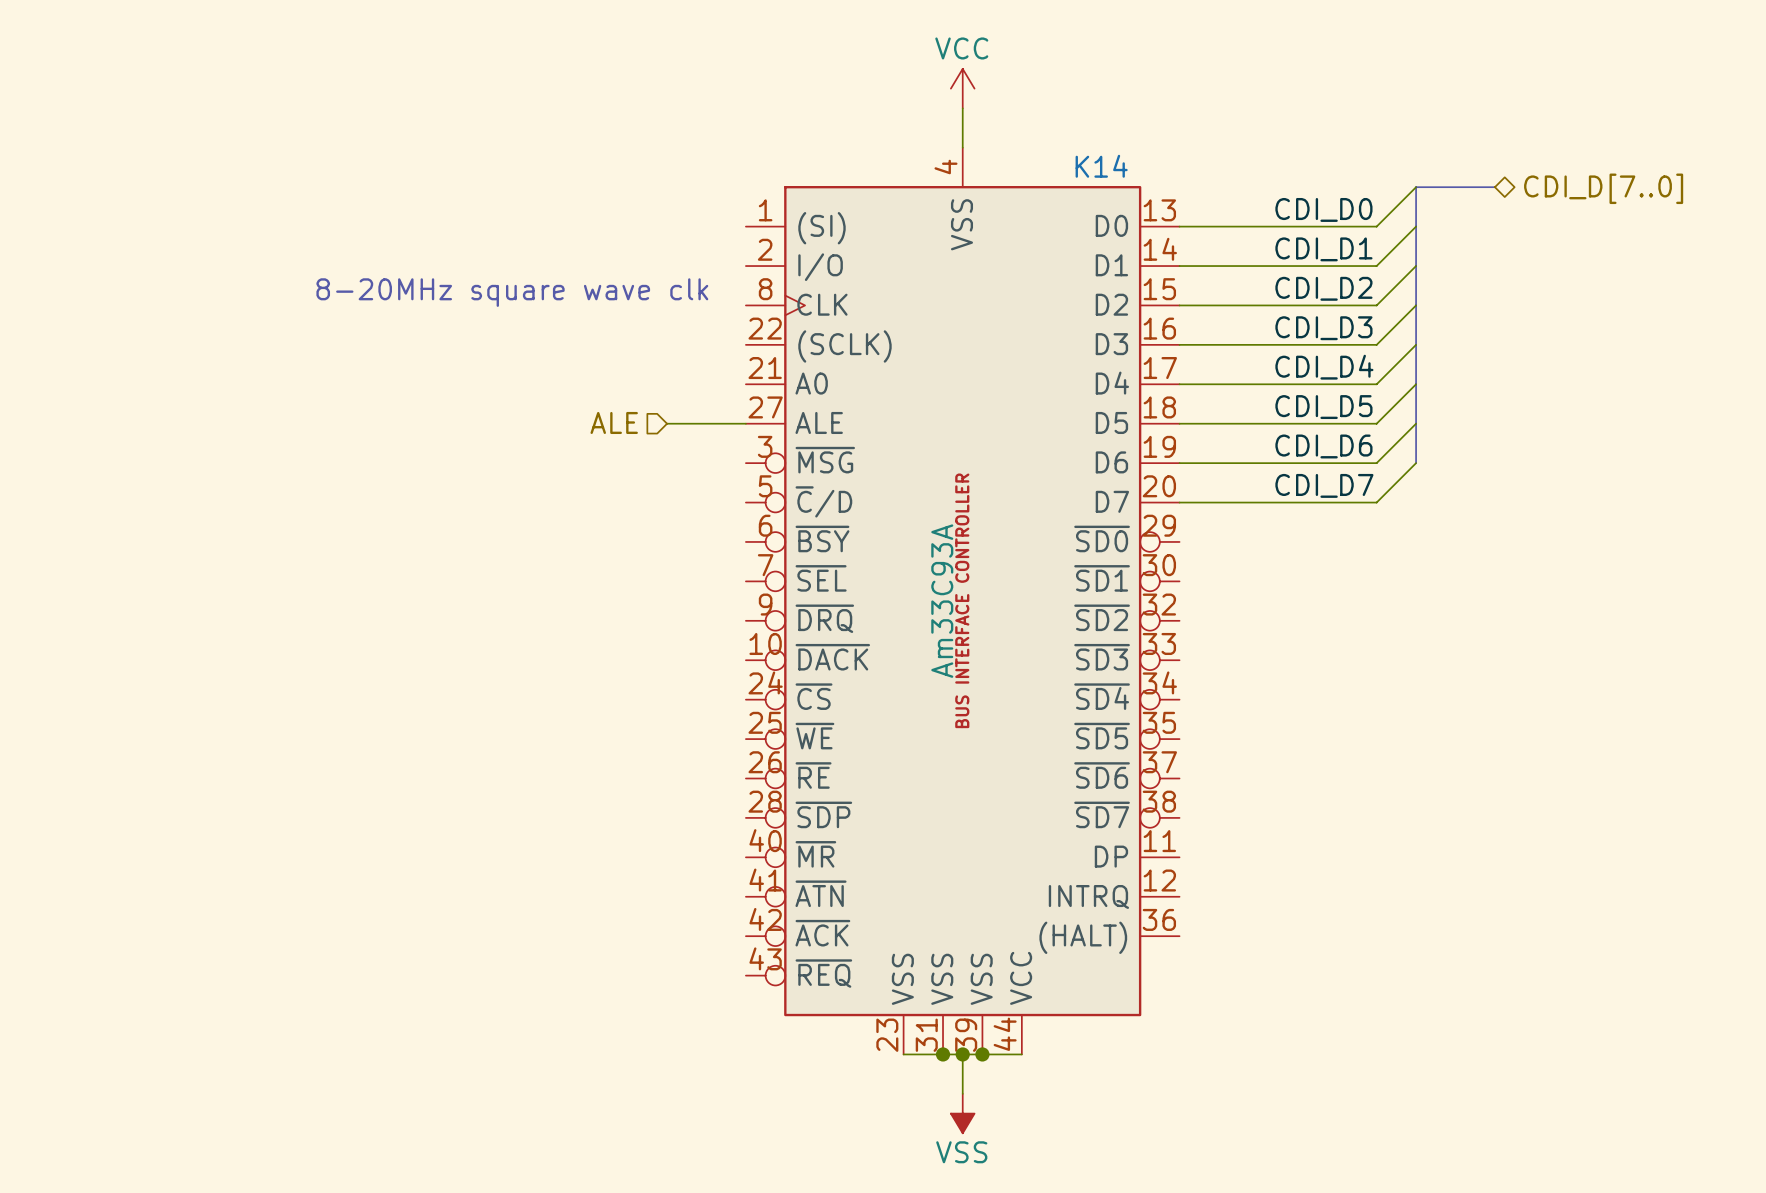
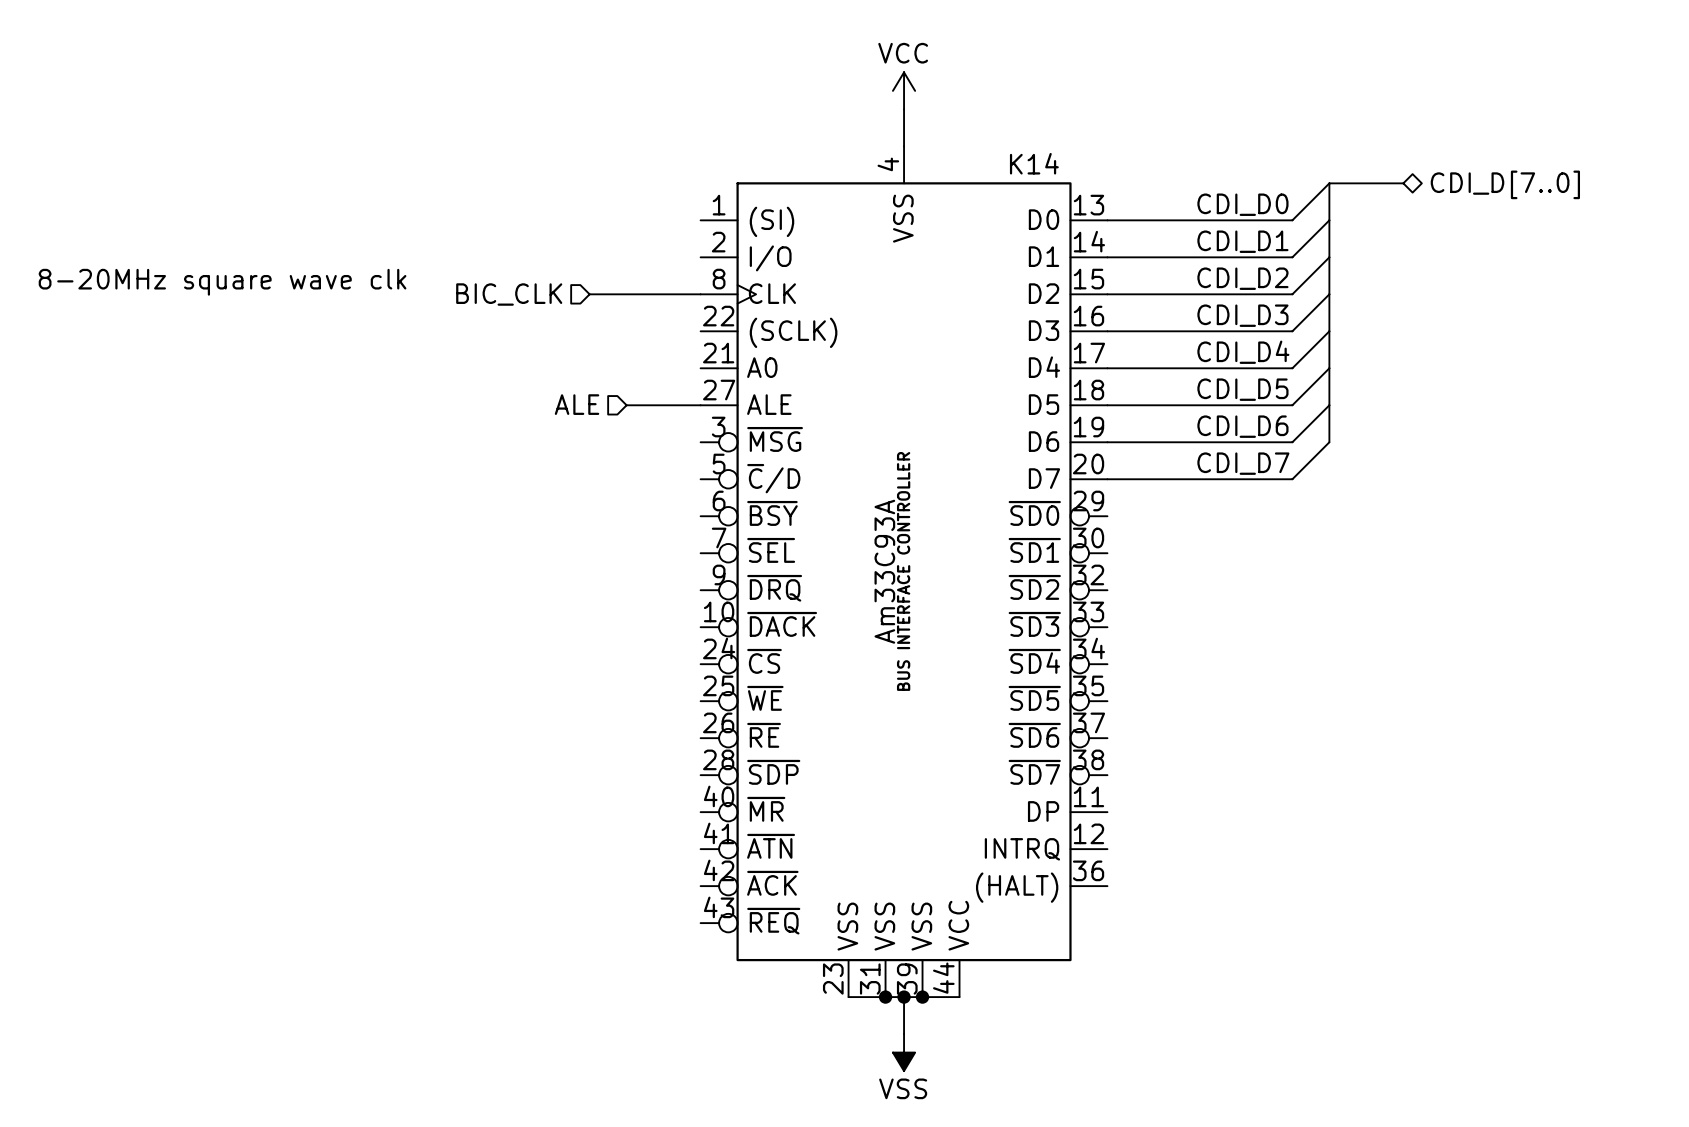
text position: 8-20MHz square wave clk (512, 292) -> 8-20MHz square wave clk (222, 282)
hierarchical label: none -> BIC_CLK (509, 294)
wire: none -> (589, 294) (700, 294)

